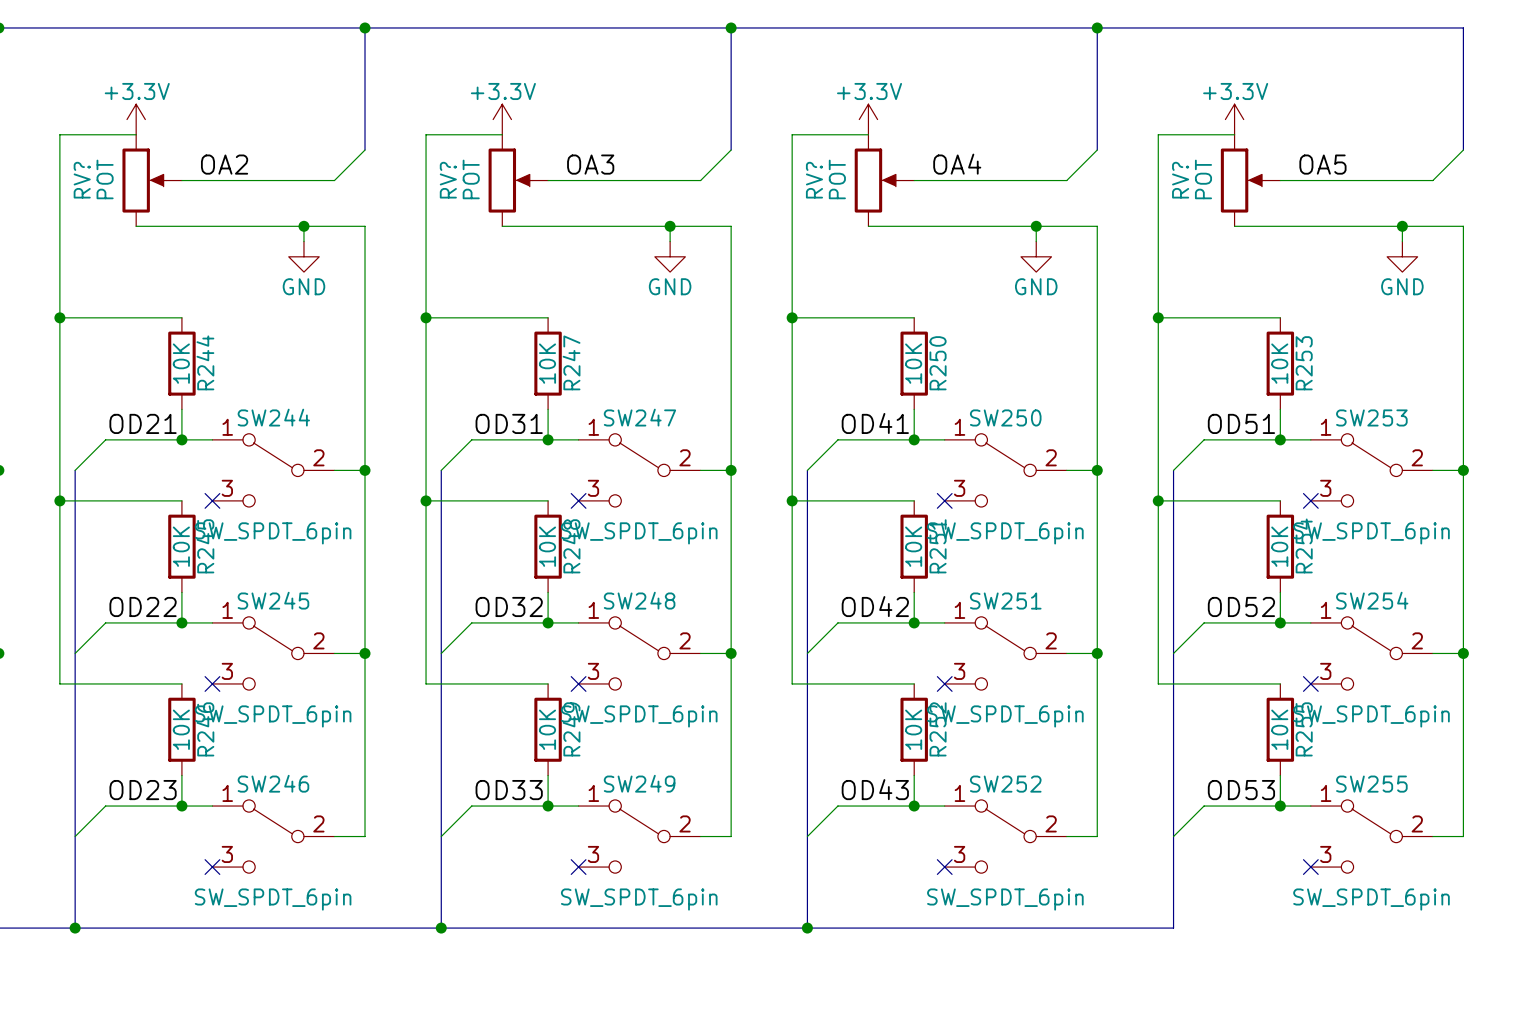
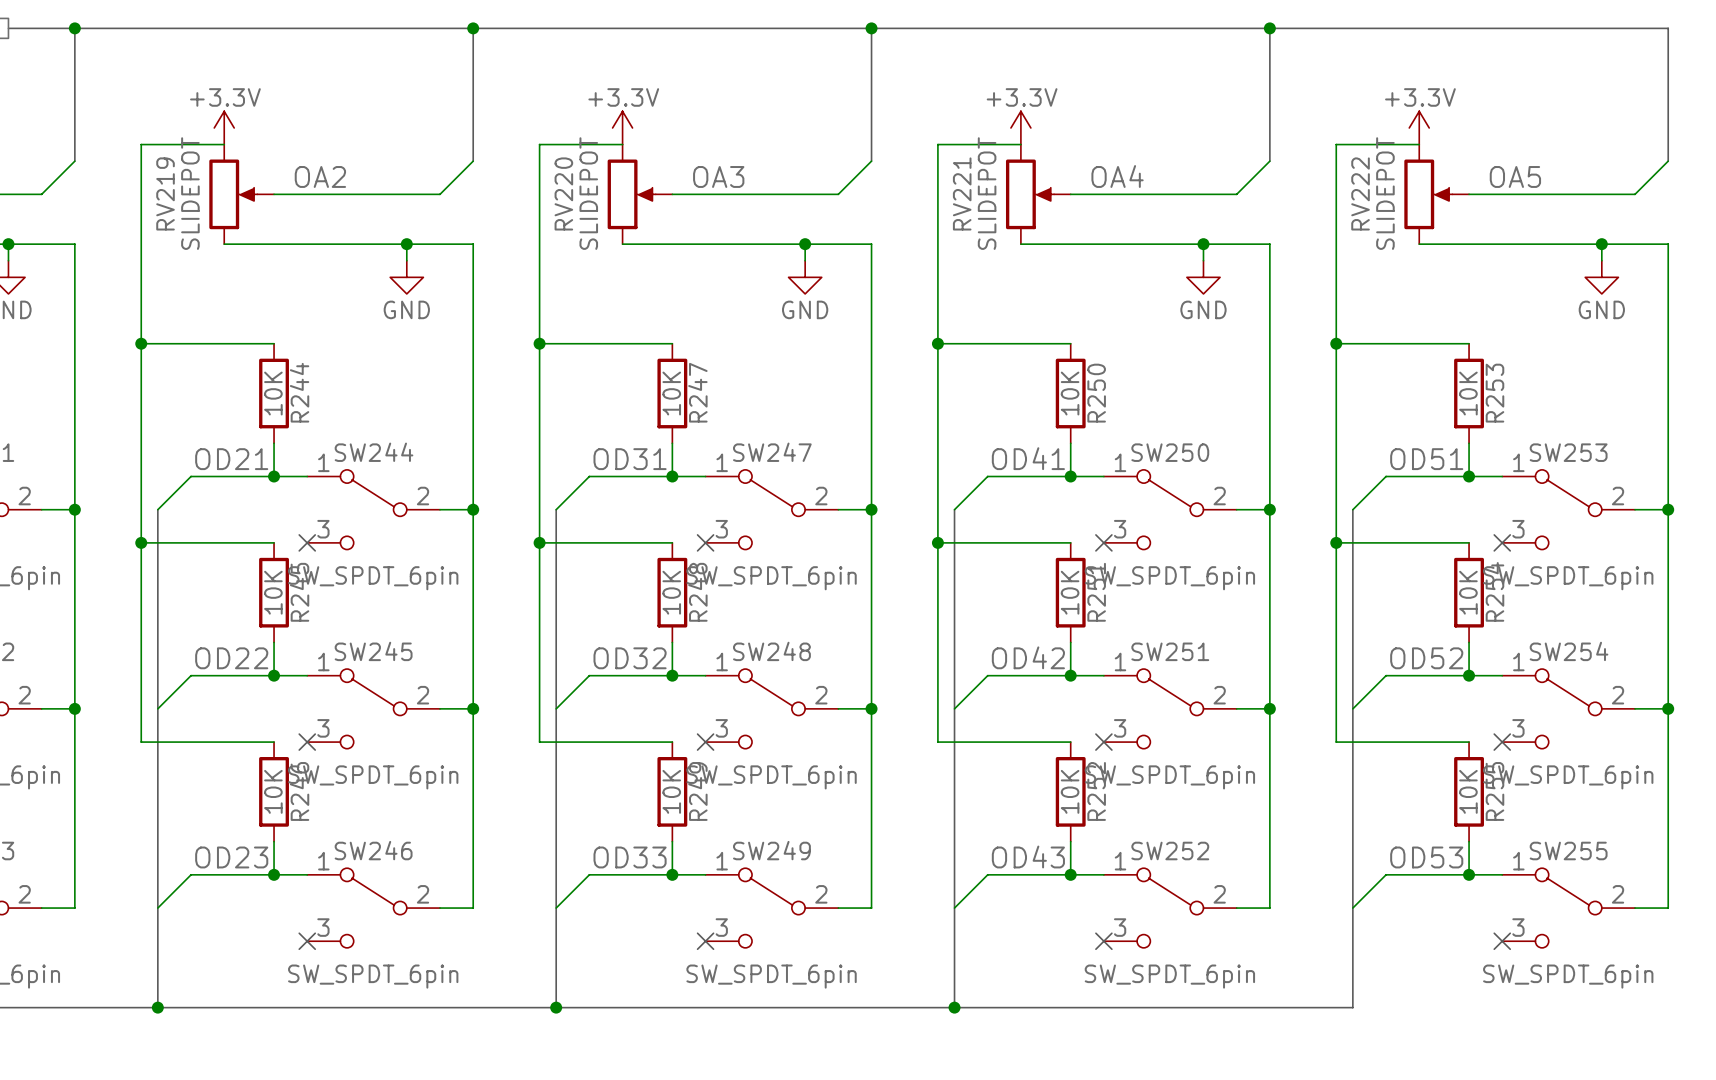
RV?: POT (152, 180) -> none
RV219: none -> SLIDEPOT (241, 194)
RV?: POT (518, 180) -> none
RV220: none -> SLIDEPOT (640, 194)
RV?: POT (884, 180) -> none
RV221: none -> SLIDEPOT (1038, 194)
RV?: POT (1250, 180) -> none
RV222: none -> SLIDEPOT (1436, 194)

